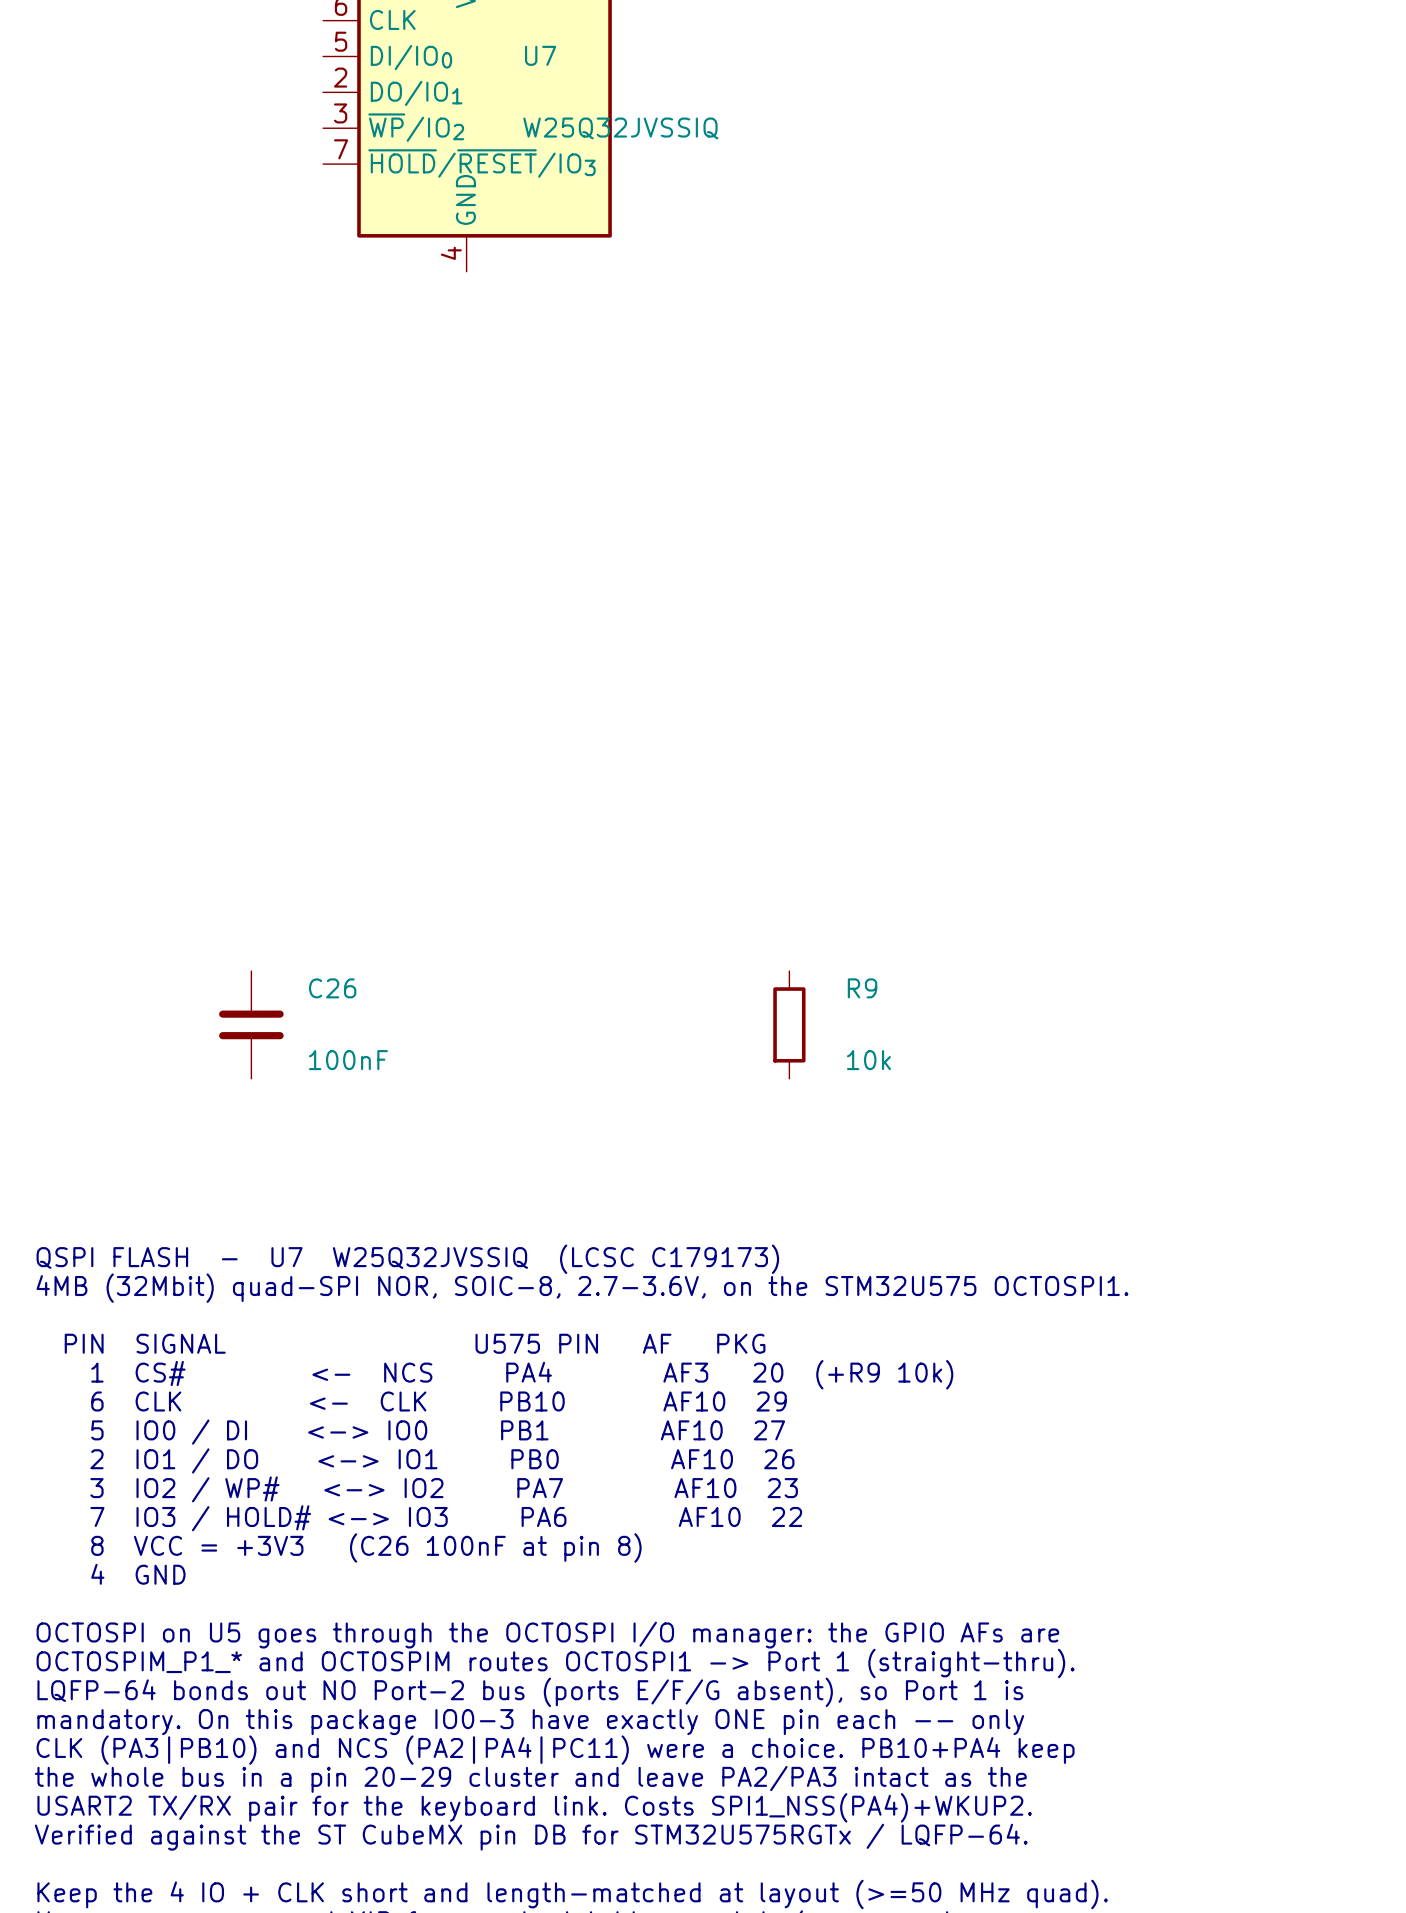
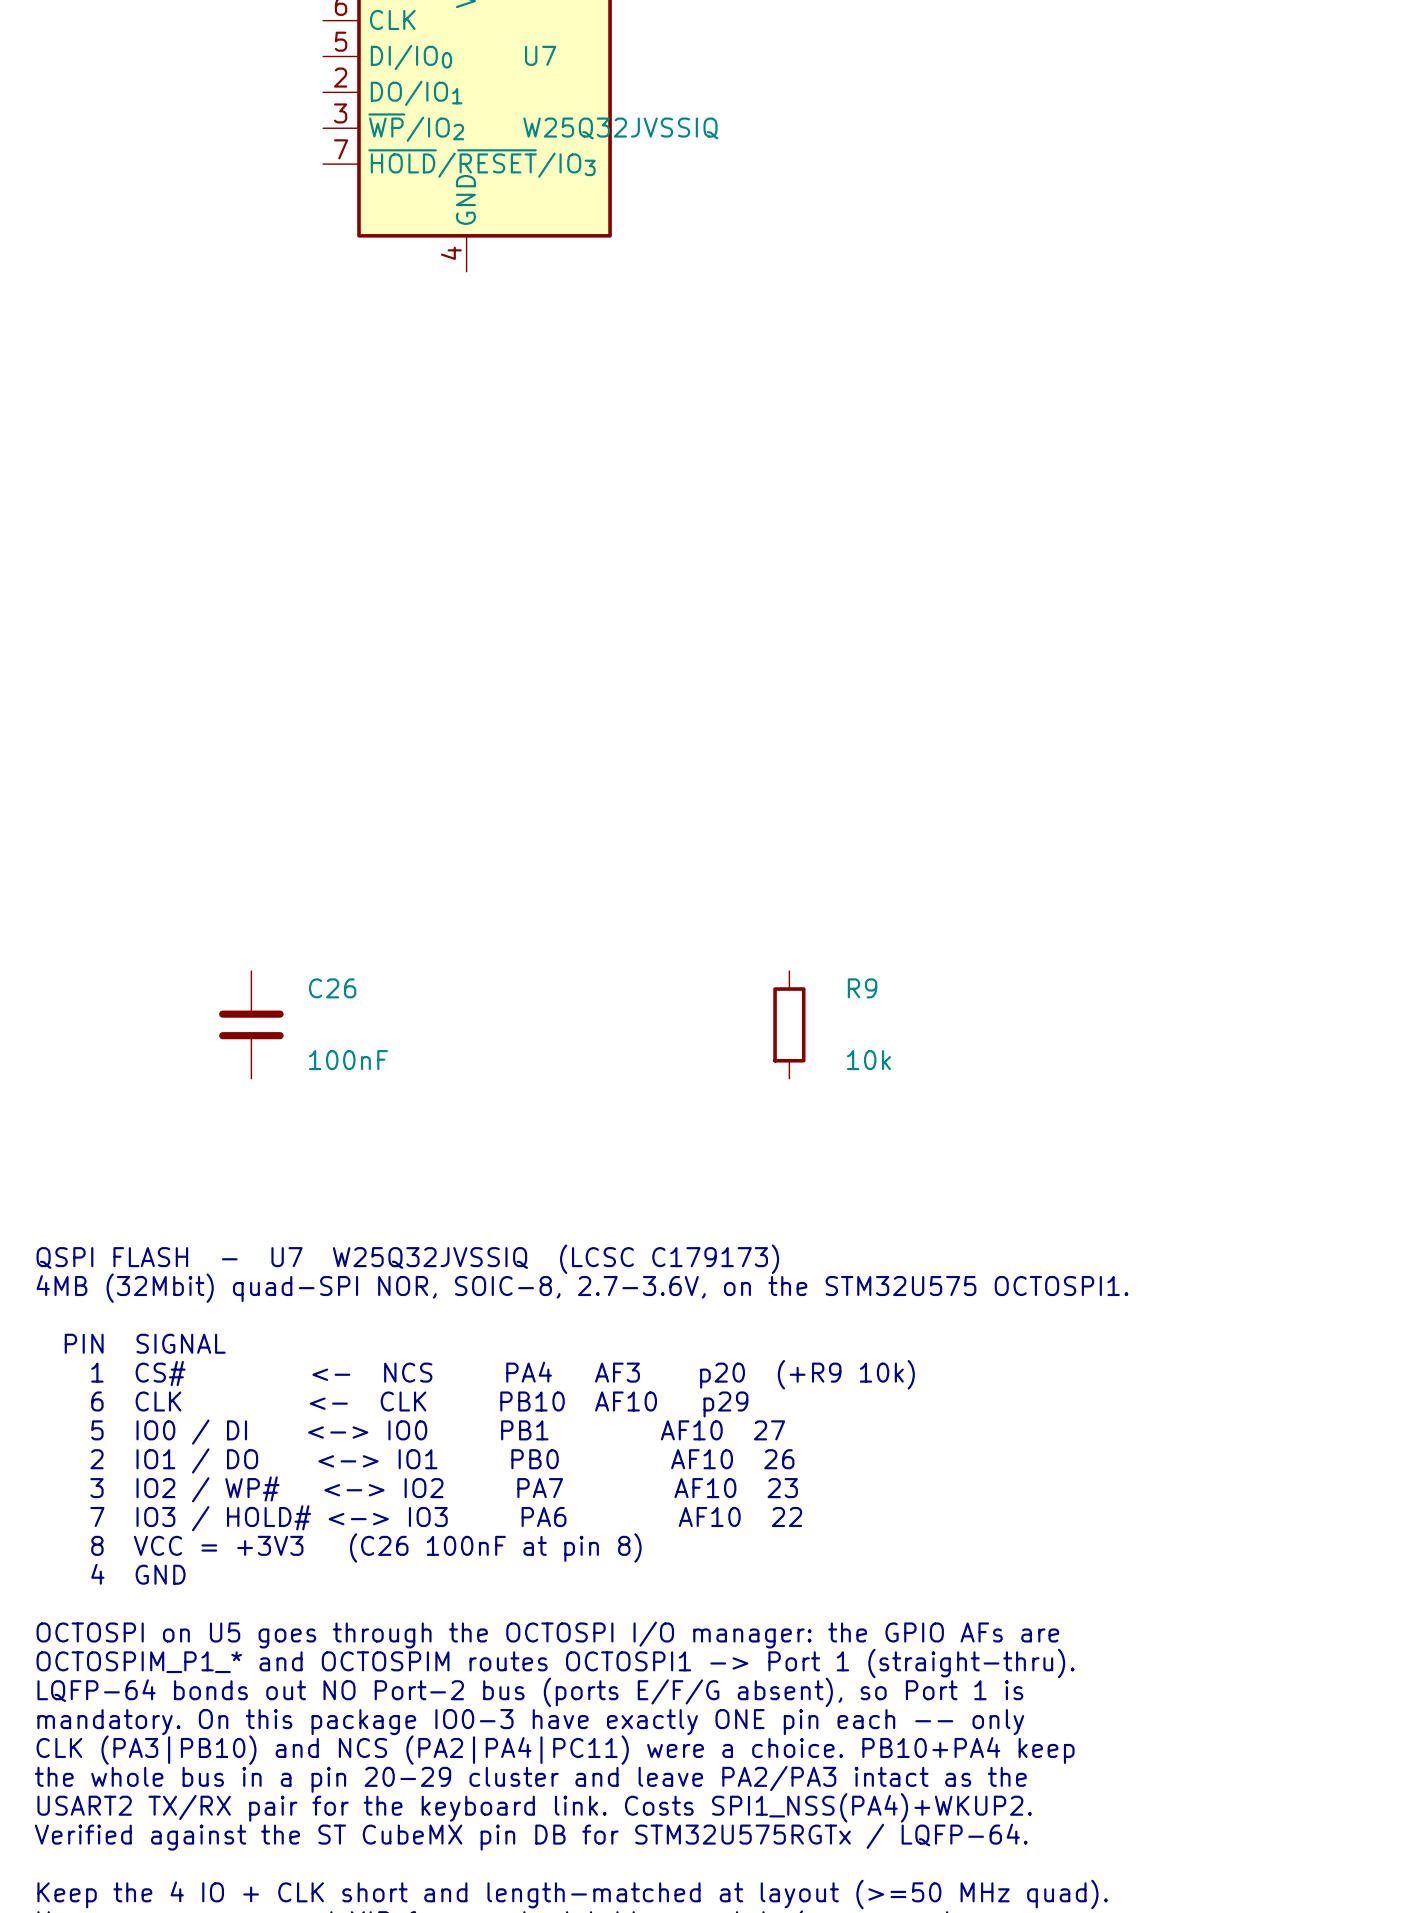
text: PIN SIGNAL U575 PIN AF PKG (415, 1343) -> PIN SIGNAL (145, 1343)
text: 1 CS# <- NCS PA4 AF3 20 (+R9 10k) (522, 1374) -> 1 CS# <- NCS PA4 AF3 p20 (+R9 10k) (503, 1374)
text: 6 CLK <- CLK PB10 AF10 29 (438, 1401) -> 6 CLK <- CLK PB10 AF10 p29 (419, 1404)

